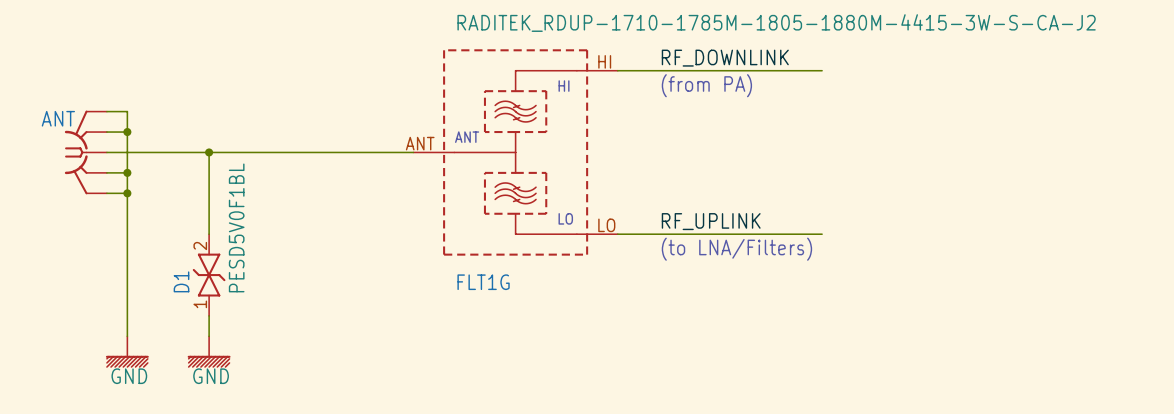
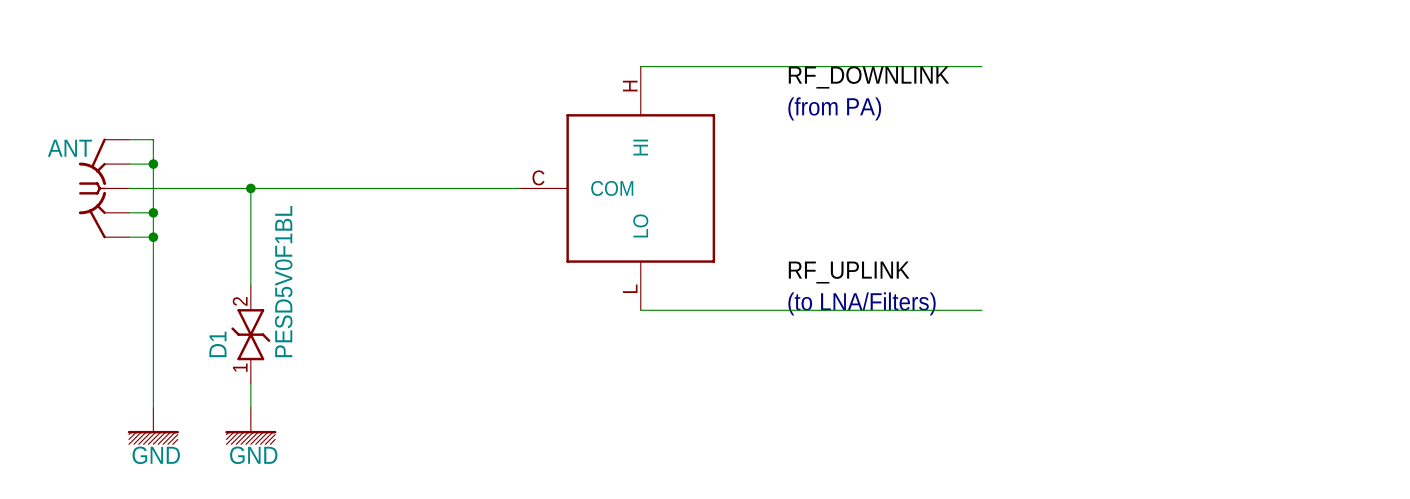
wire: none -> (640, 66) (981, 66)
wire: (617, 70) (822, 70) -> none
FLT1G: RADITEK_RDUP-1710-1785M-1805-1880M-4415-3W-S-CA-J2 (515, 152) -> none
part: none -> (617, 188)
wire: (617, 234) (822, 234) -> none
wire: none -> (640, 310) (981, 310)

